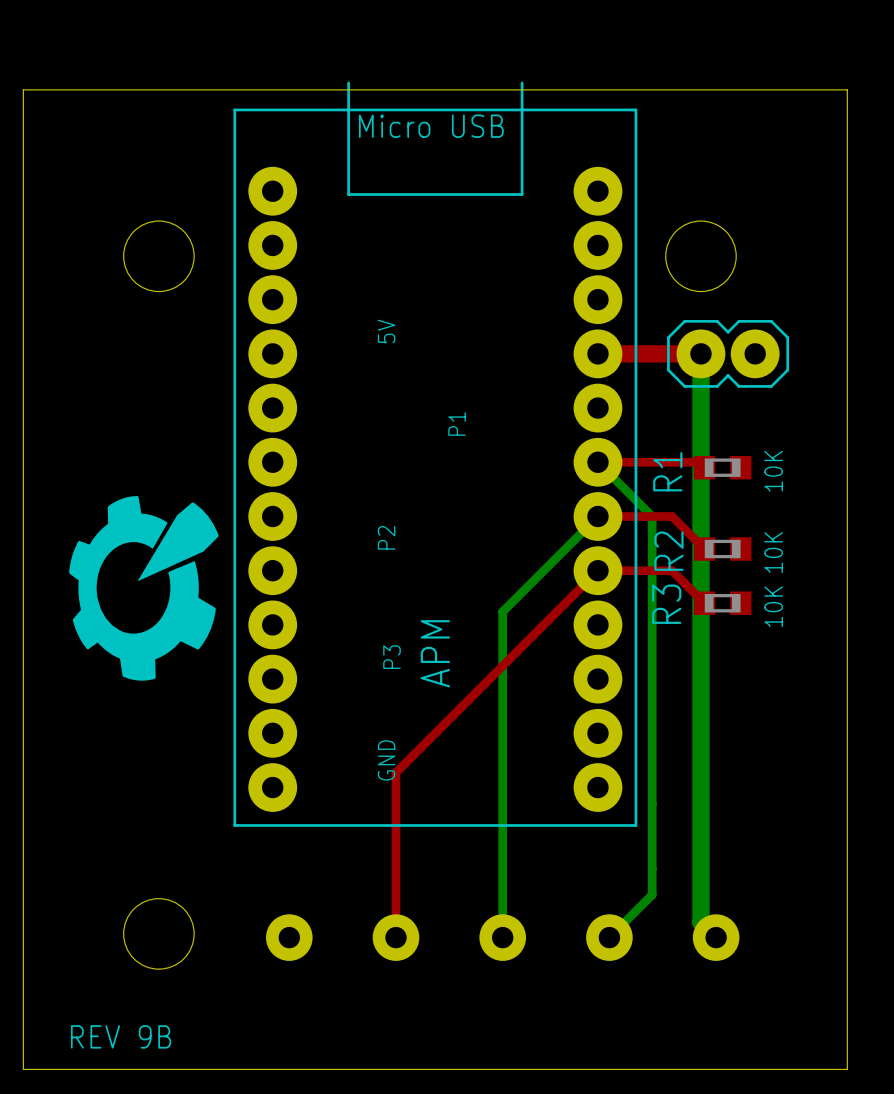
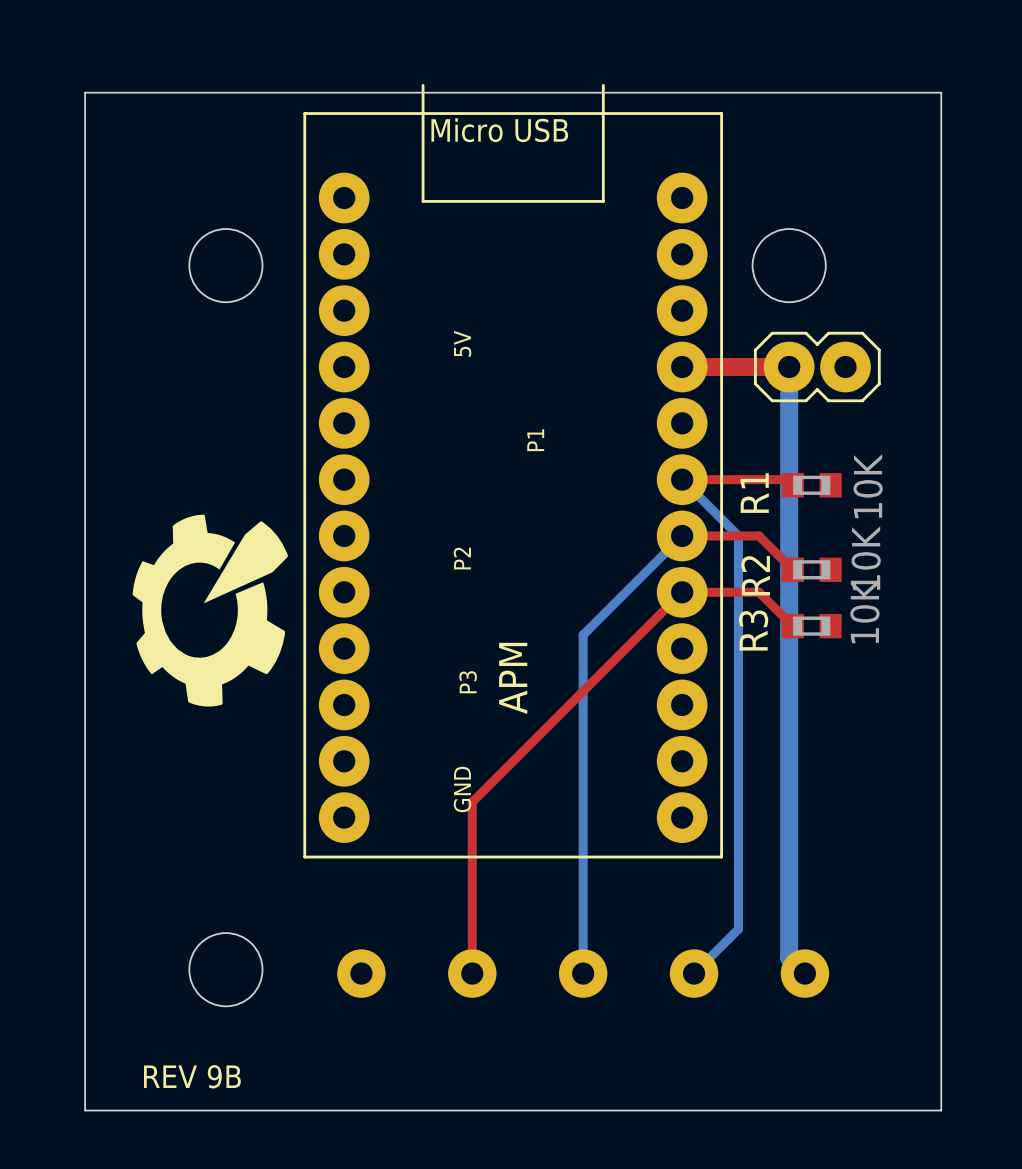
text: 10K (773, 471) -> none
R1 value: none -> 10K (868, 486)
R2 value: none -> 10K (866, 558)
text: 10K (773, 552) -> none
R3 value: none -> 10K (864, 611)
text: 10K (773, 606) -> none

